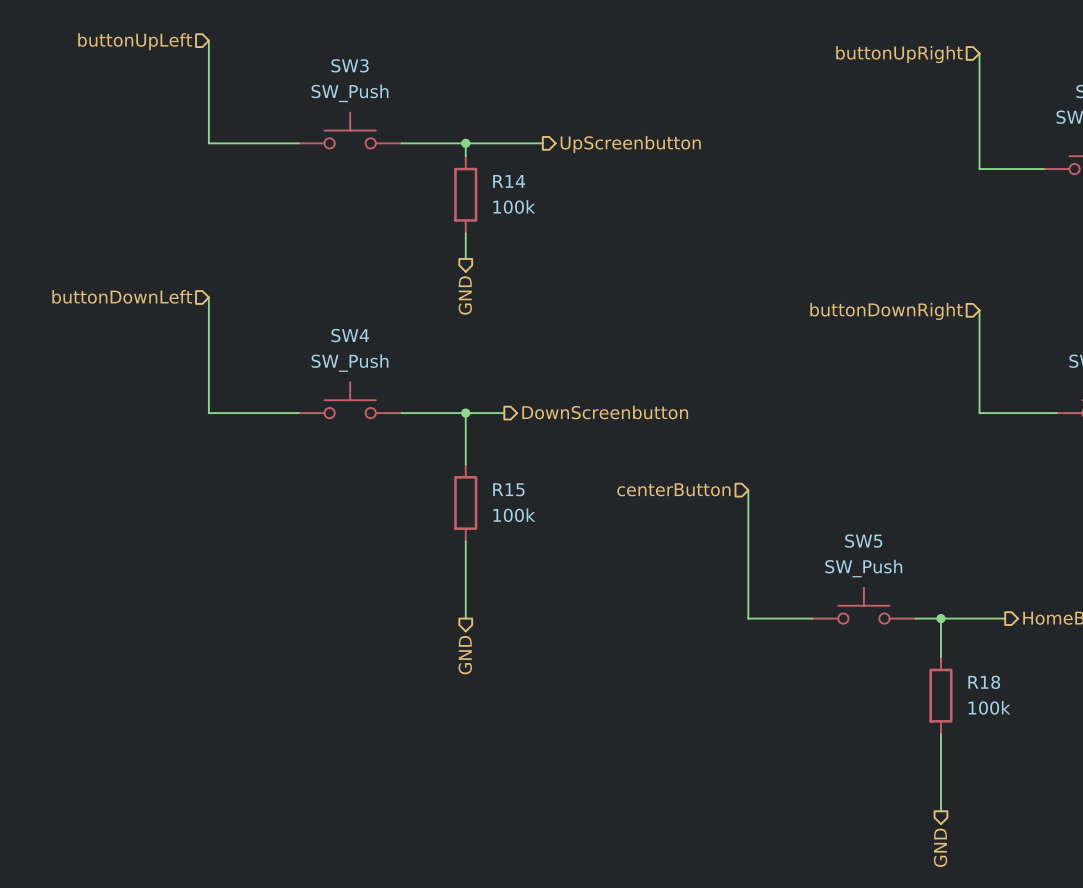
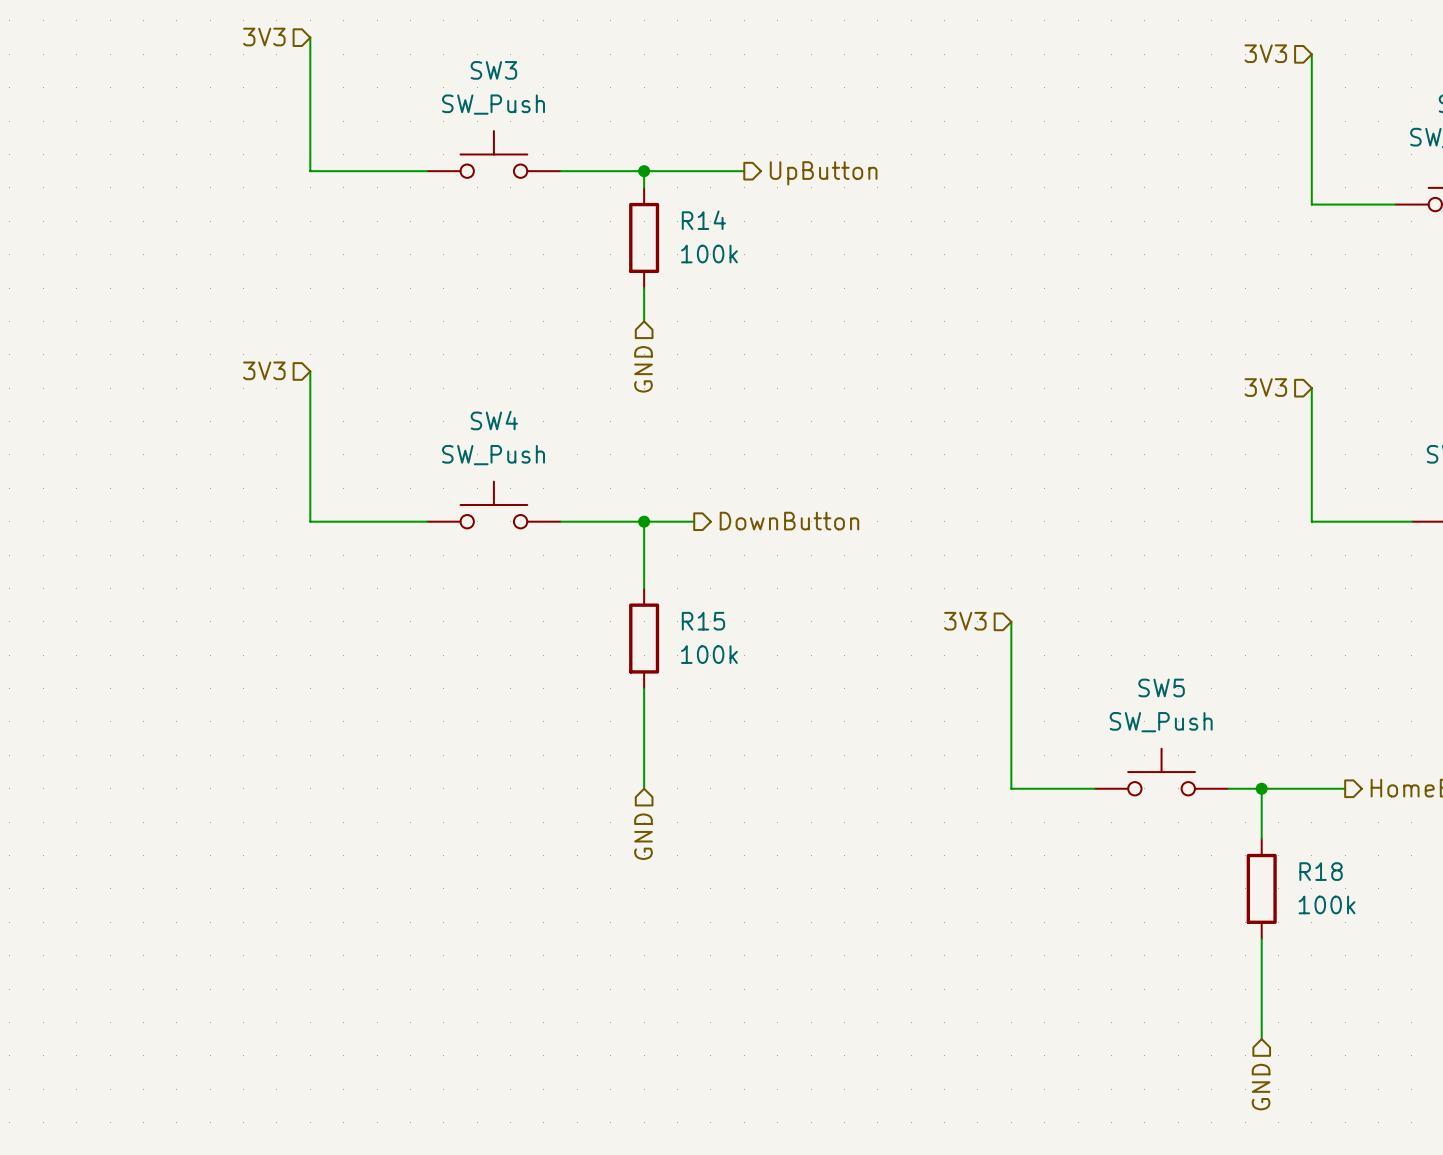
hierarchical label: buttonUpLeft (135, 41) -> 3V3 (264, 37)
hierarchical label: buttonUpRight (899, 54) -> 3V3 (1265, 53)
hierarchical label: UpScreenbutton (630, 144) -> UpButton (823, 173)
hierarchical label shape: output (465, 295) -> input (643, 369)
hierarchical label: buttonDownLeft (122, 296) -> 3V3 (264, 370)
hierarchical label: buttonDownRight (886, 311) -> 3V3 (1265, 387)
hierarchical label: DownScreenbutton (605, 412) -> DownButton (789, 521)
hierarchical label: centerButton (673, 489) -> 3V3 (965, 621)
hierarchical label shape: output (465, 655) -> input (643, 836)
hierarchical label shape: output (940, 847) -> input (1261, 1087)

